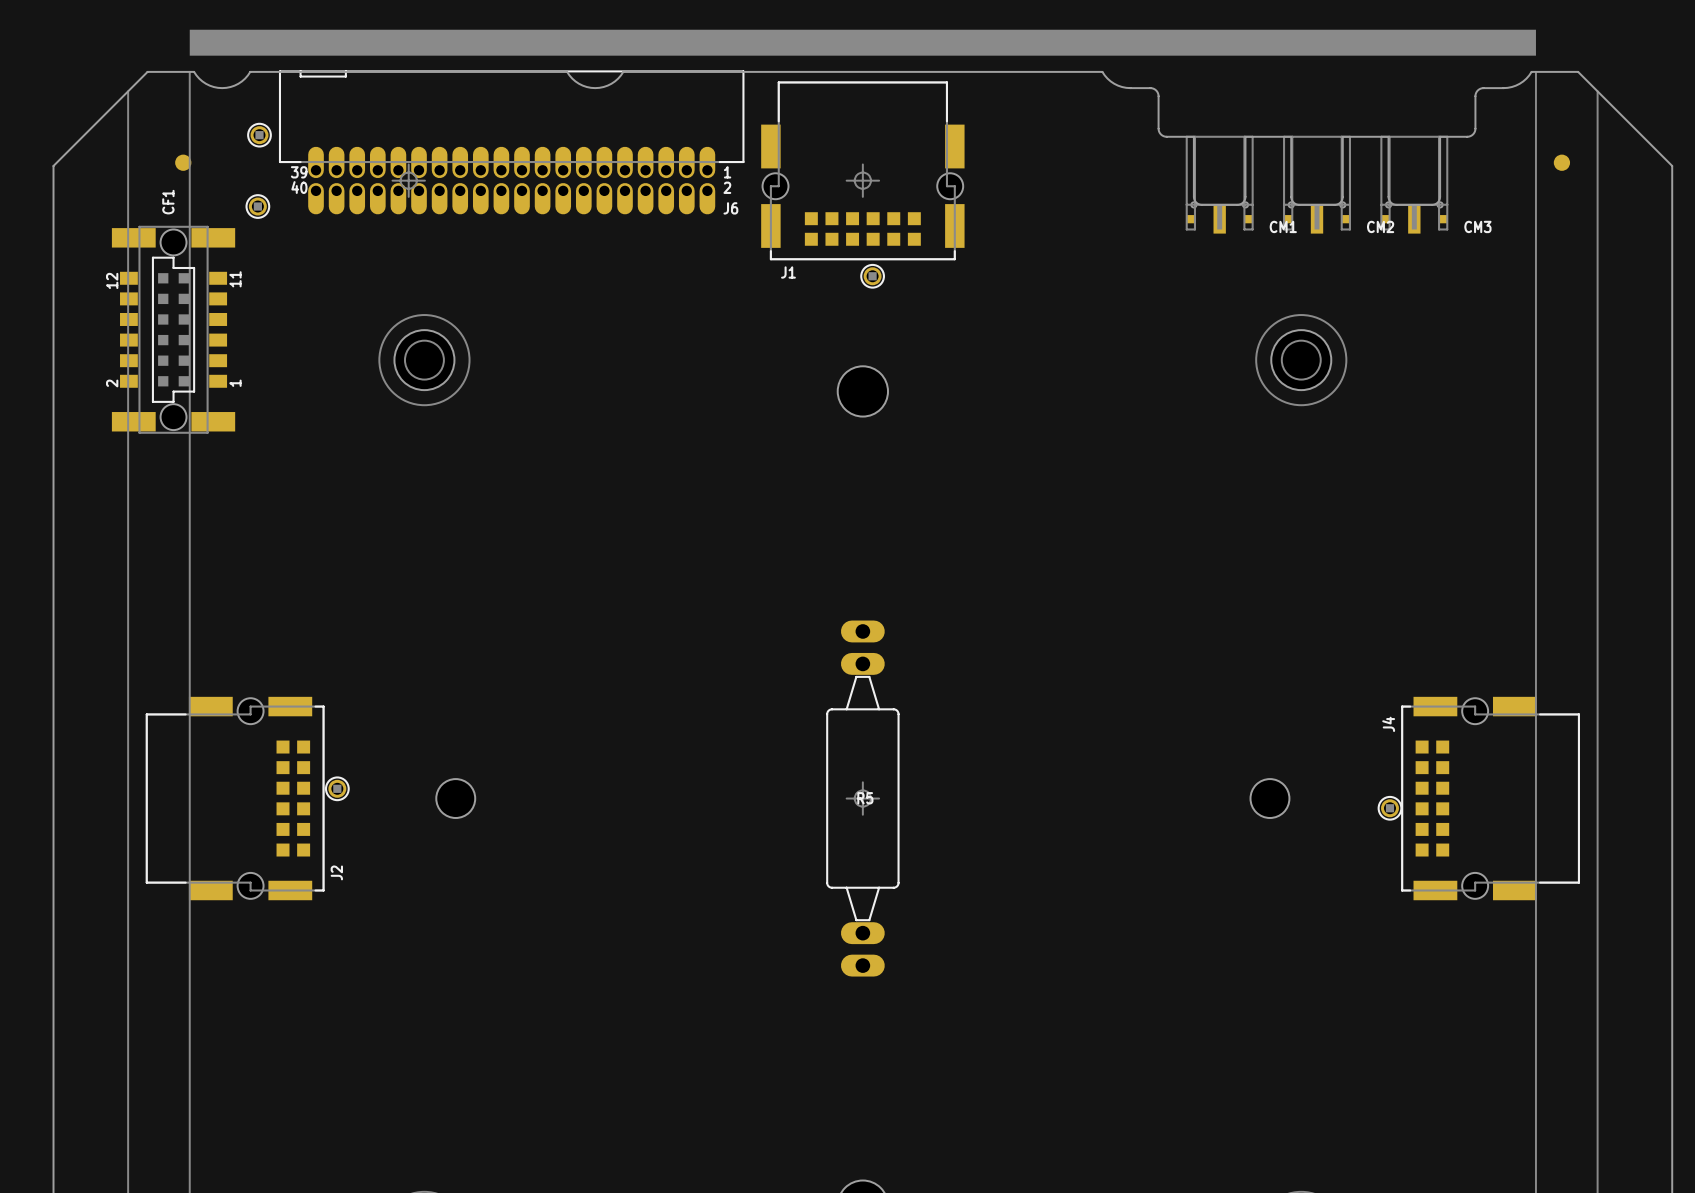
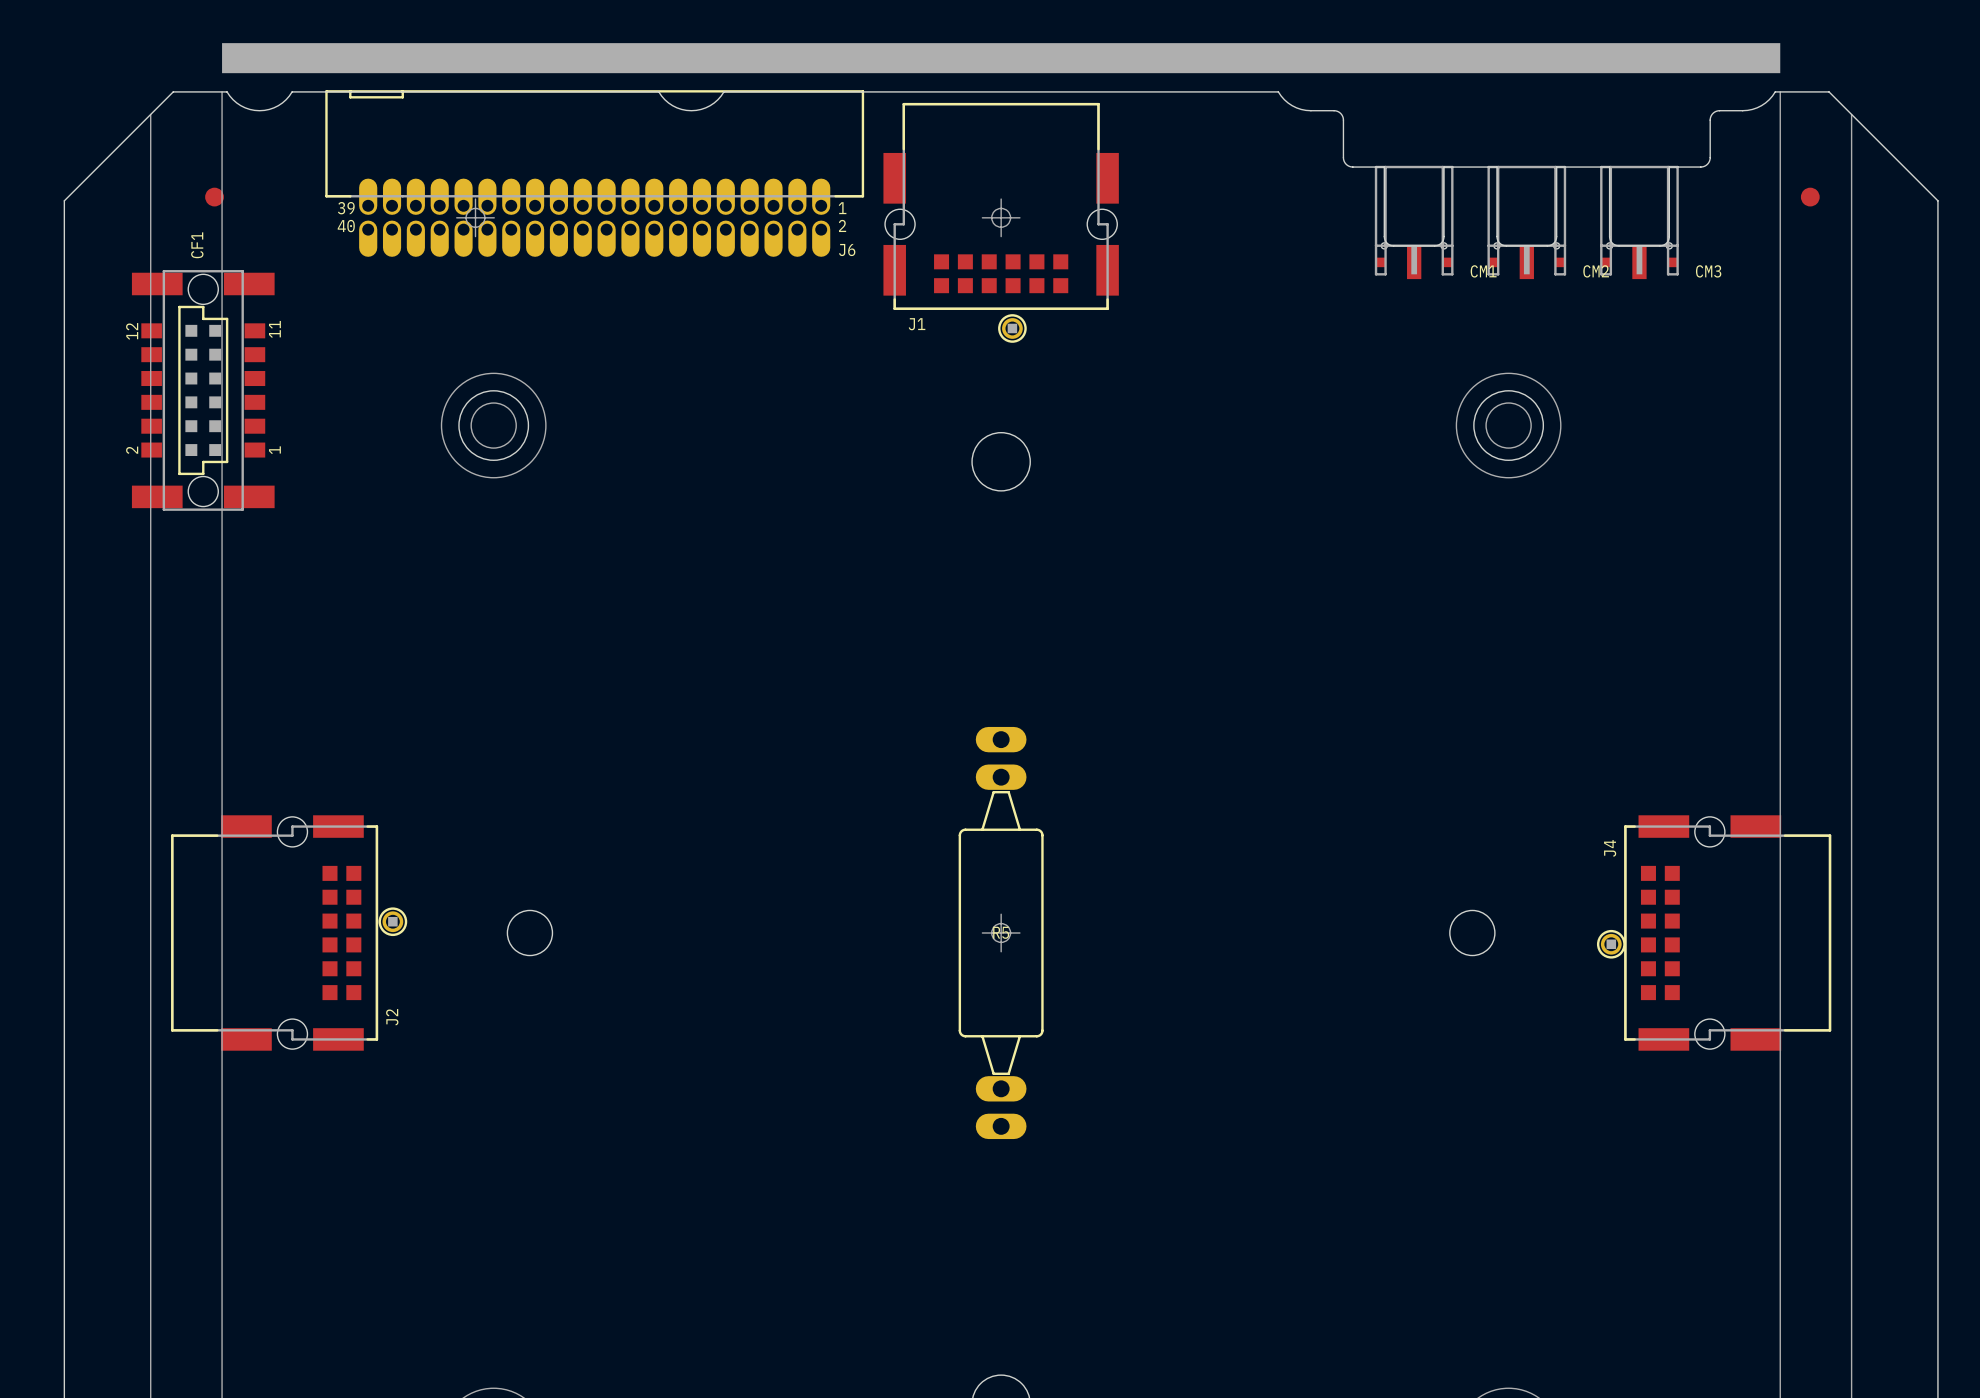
part: (259, 135) -> none
part: (257, 206) -> none

